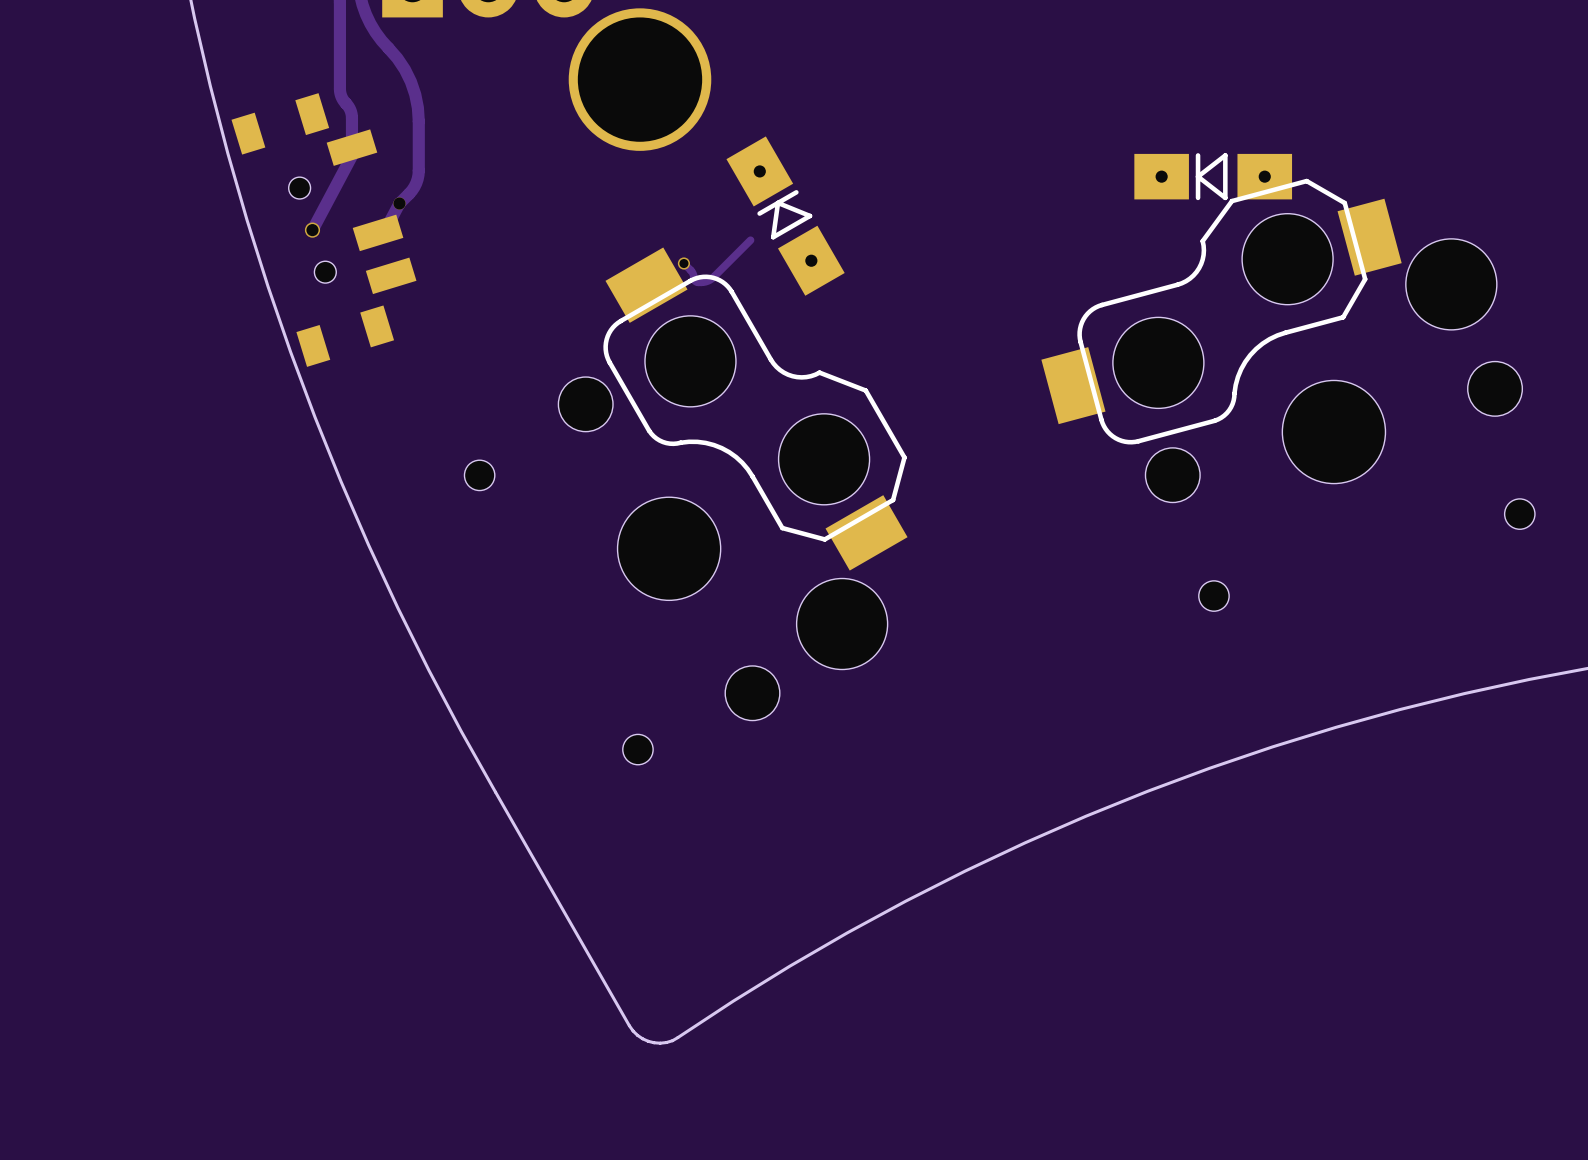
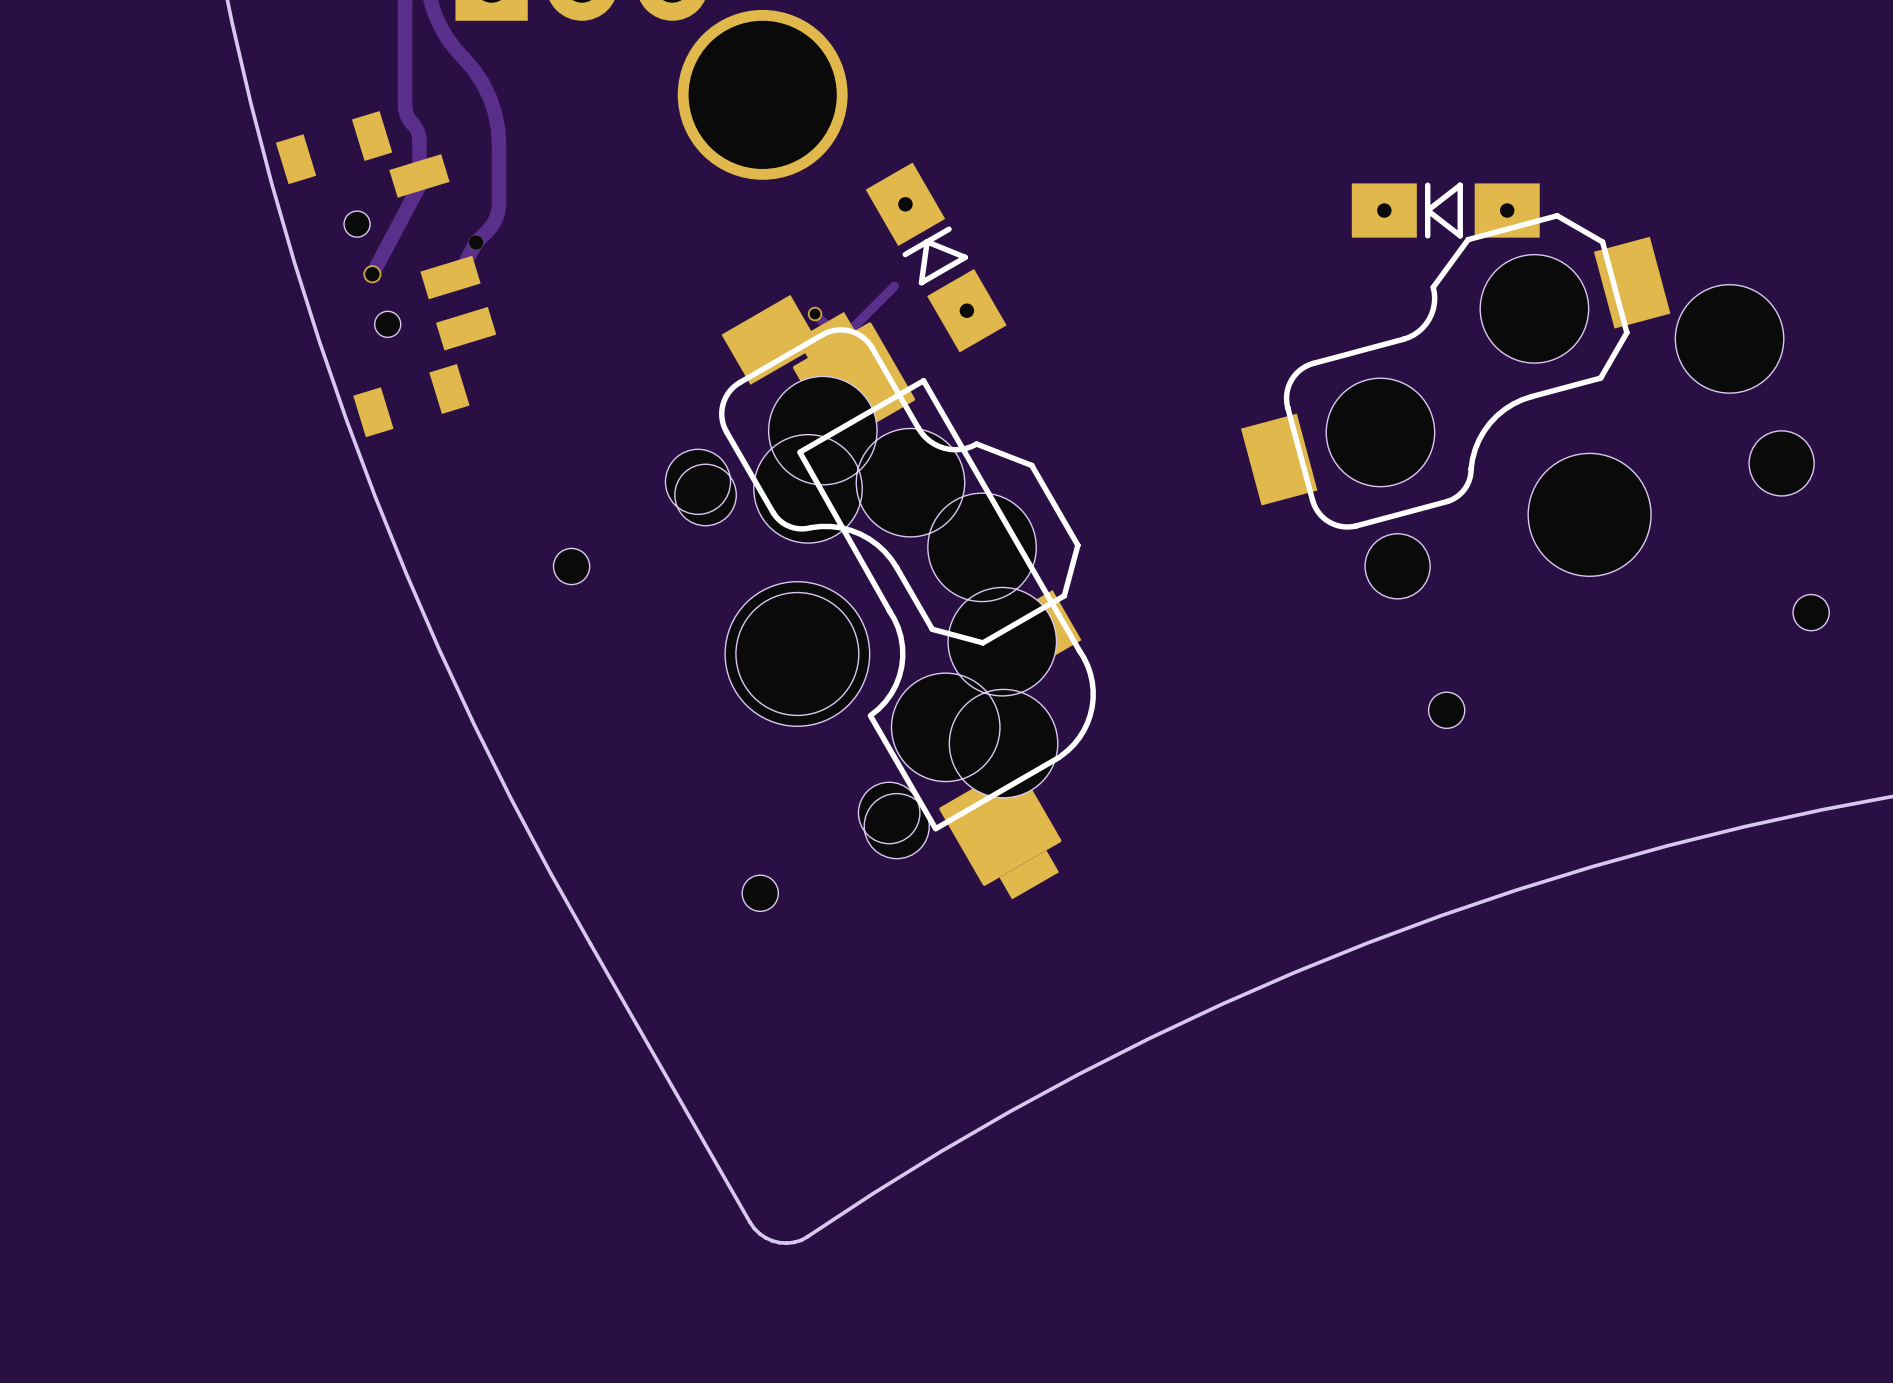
part: none -> (885, 605)

